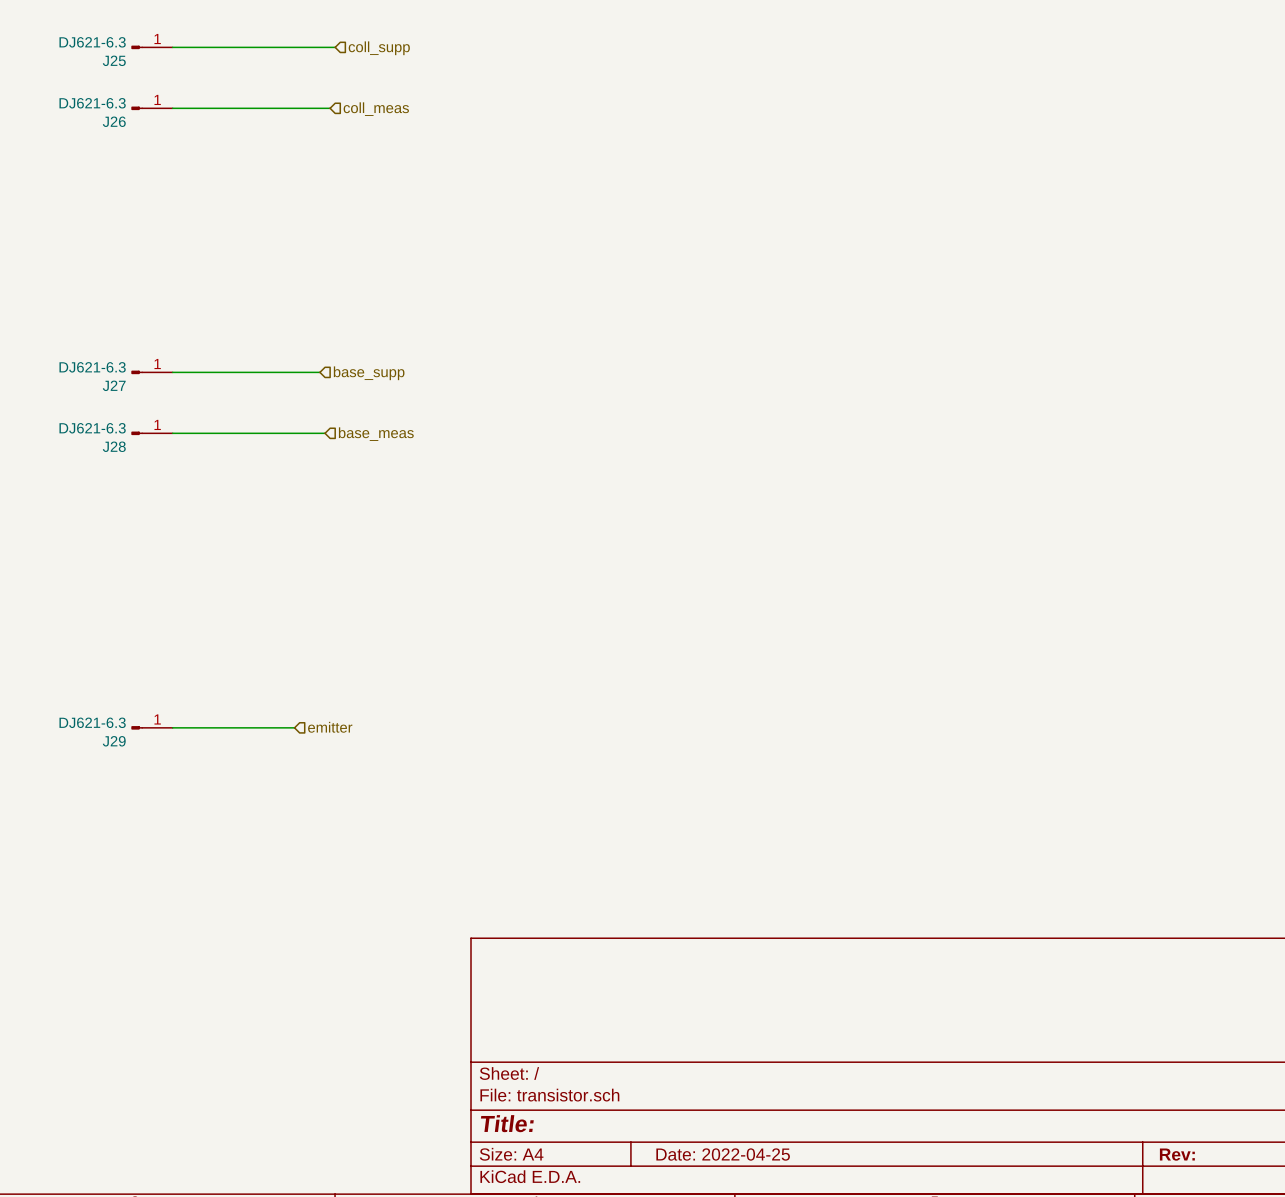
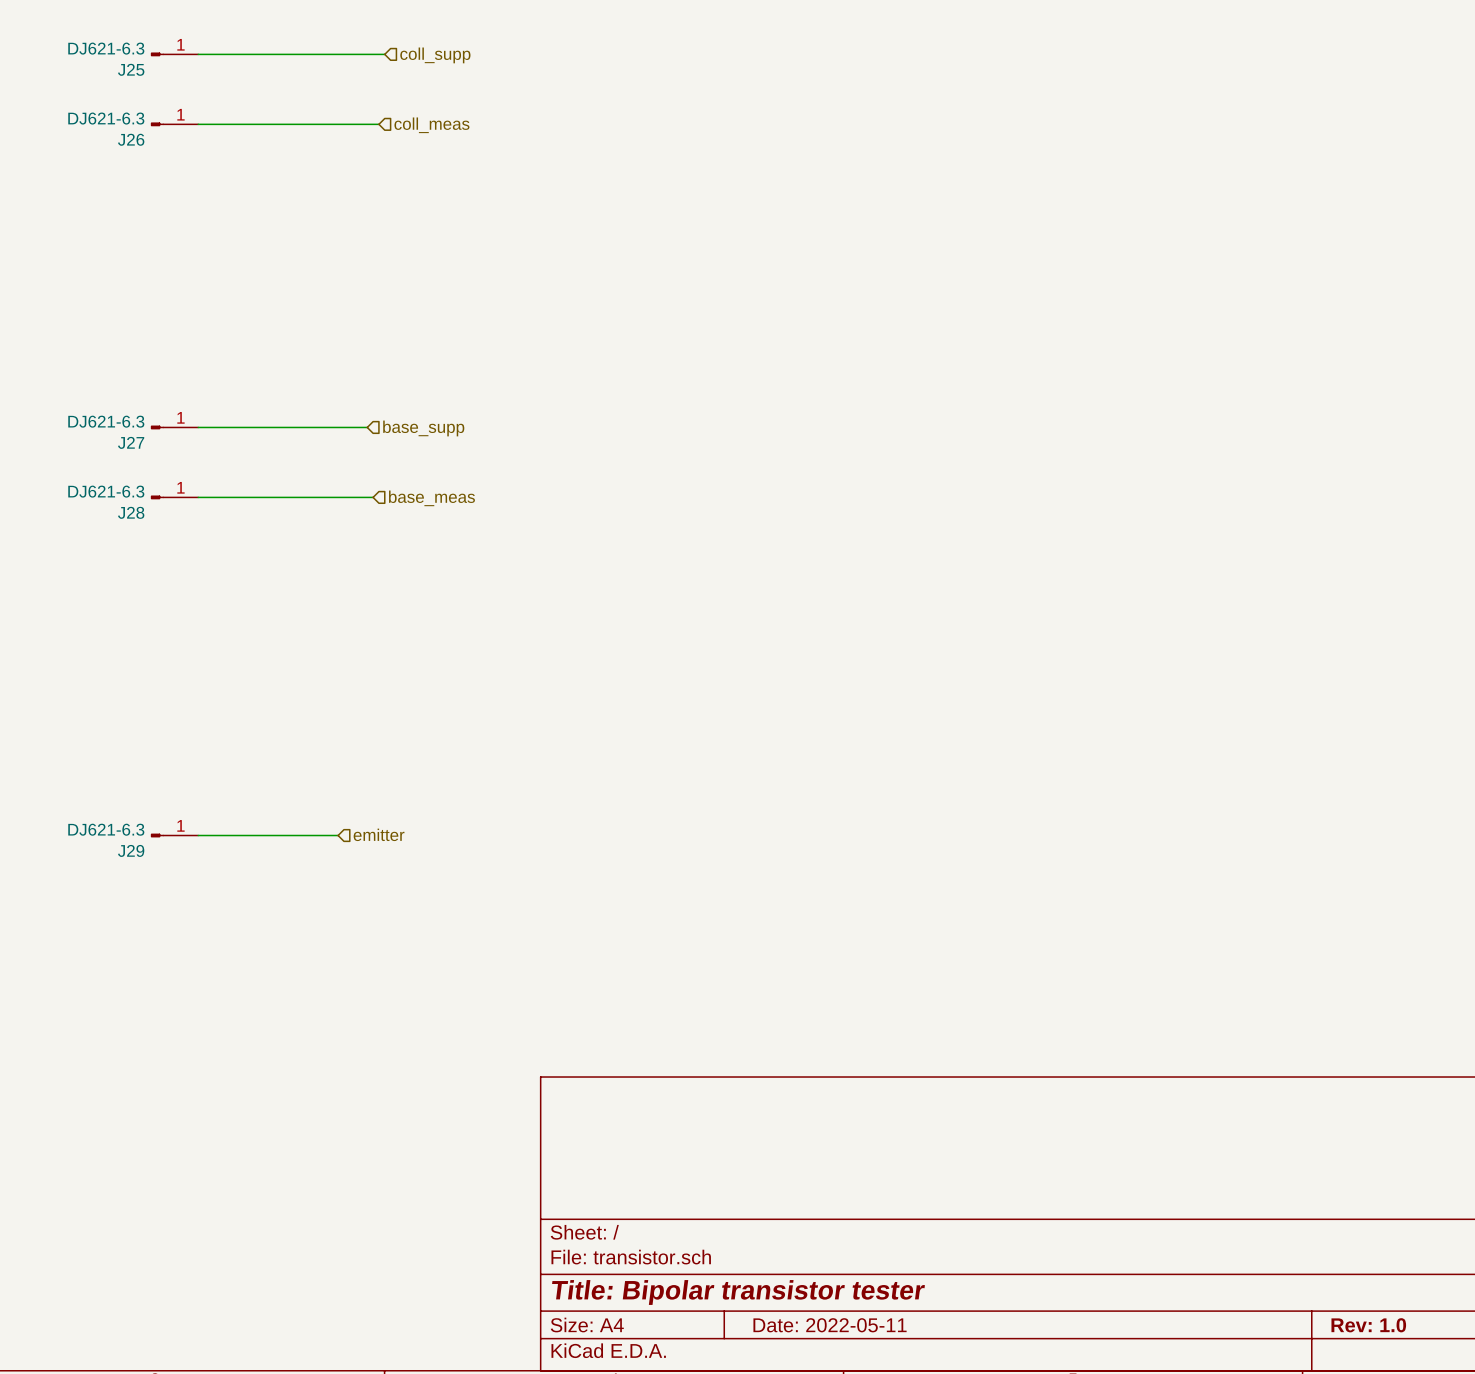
title block: Title: (507, 1123) -> Title: Bipolar transistor tester (738, 1292)
title block: Date: 2022-04-25 (723, 1154) -> Date: 2022-05-11 (830, 1325)
title block: Rev: (1177, 1154) -> Rev: 1.0 (1368, 1325)

